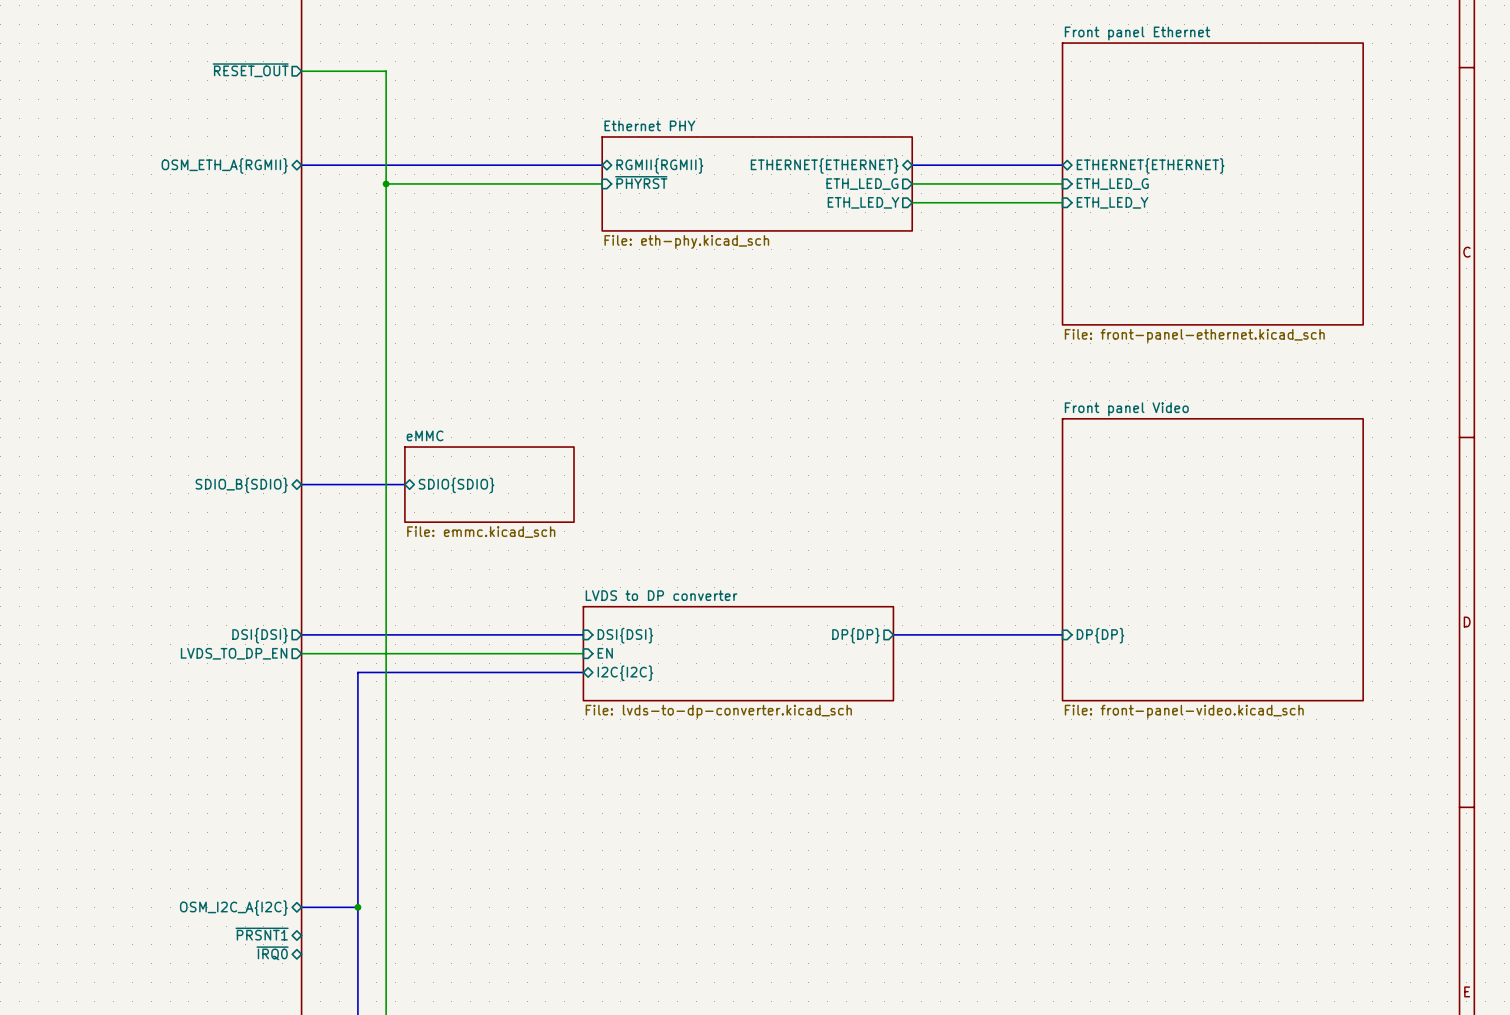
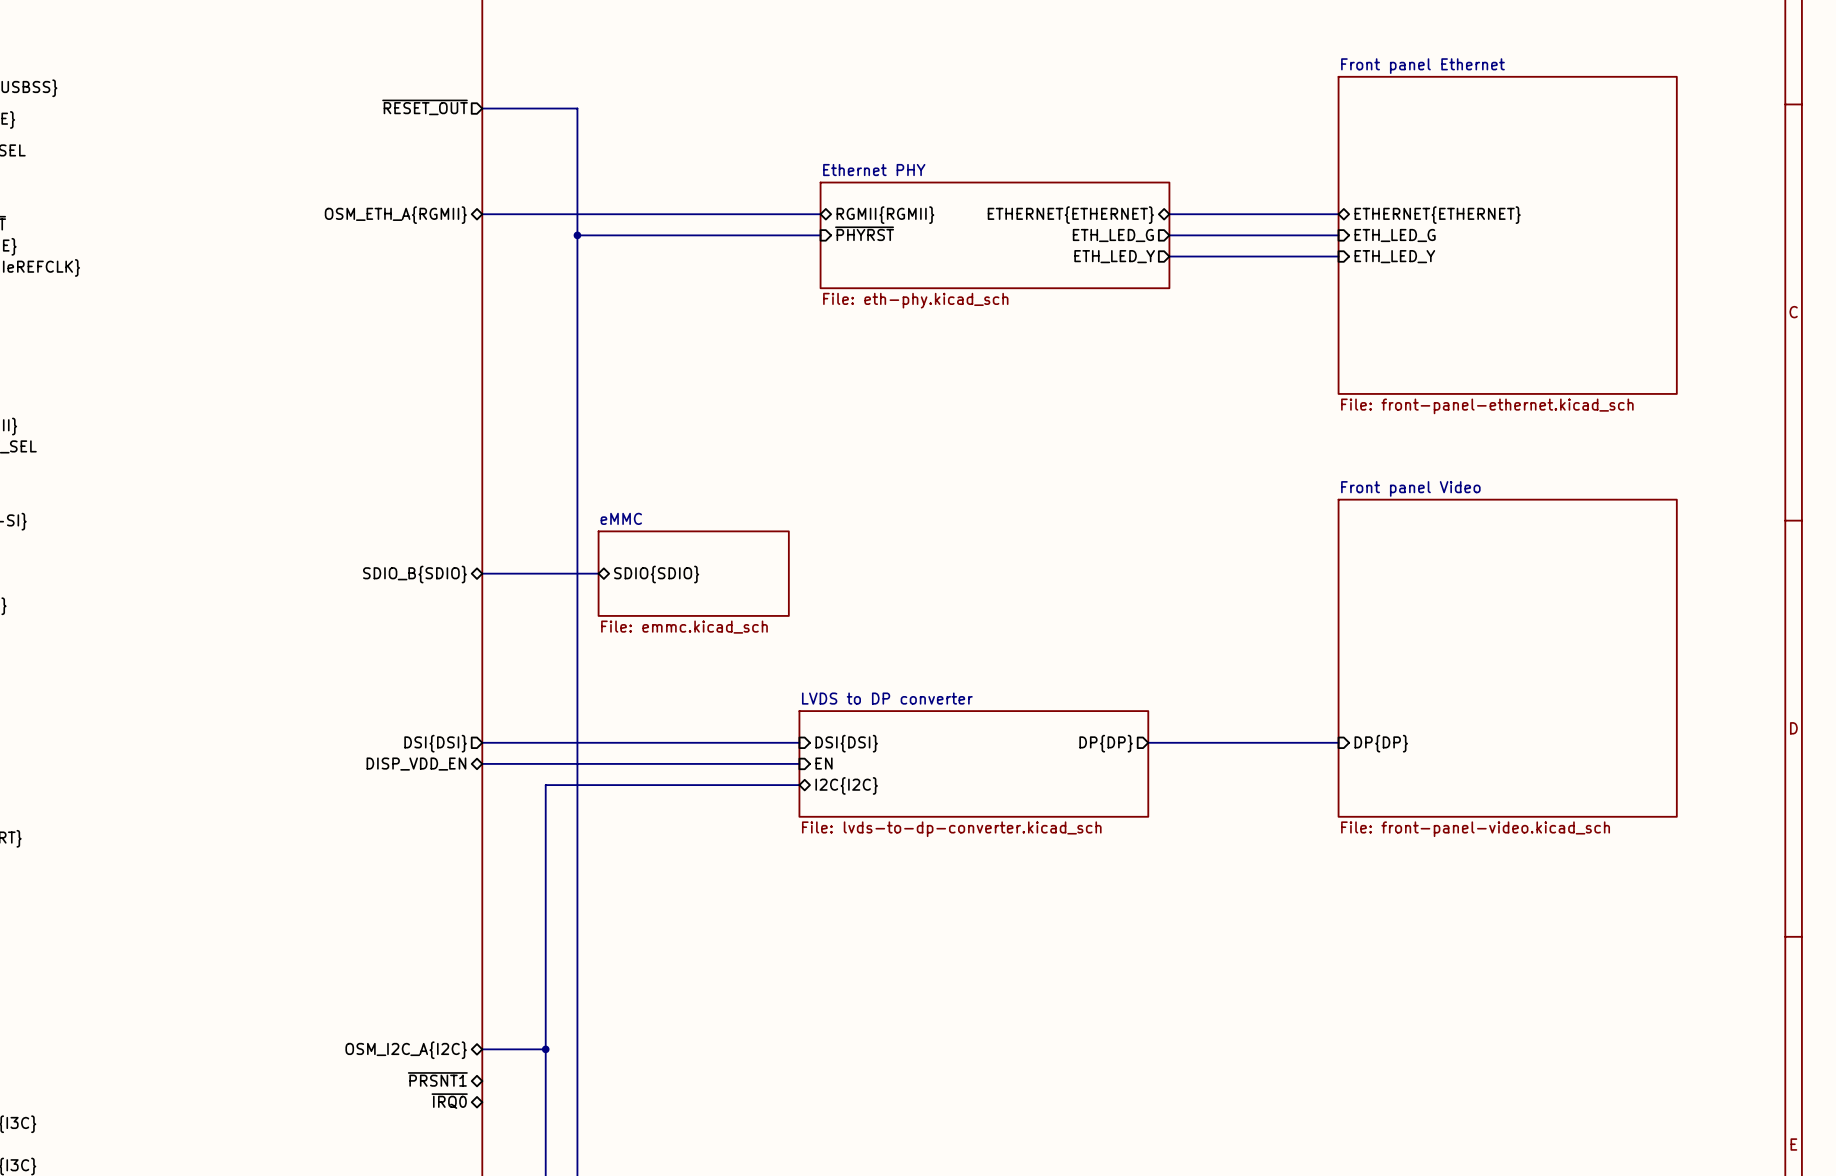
sheet pin shape: output (234, 653) -> bidirectional (416, 764)
sheet pin: LVDS_TO_DP_EN (234, 653) -> DISP_VDD_EN (416, 764)

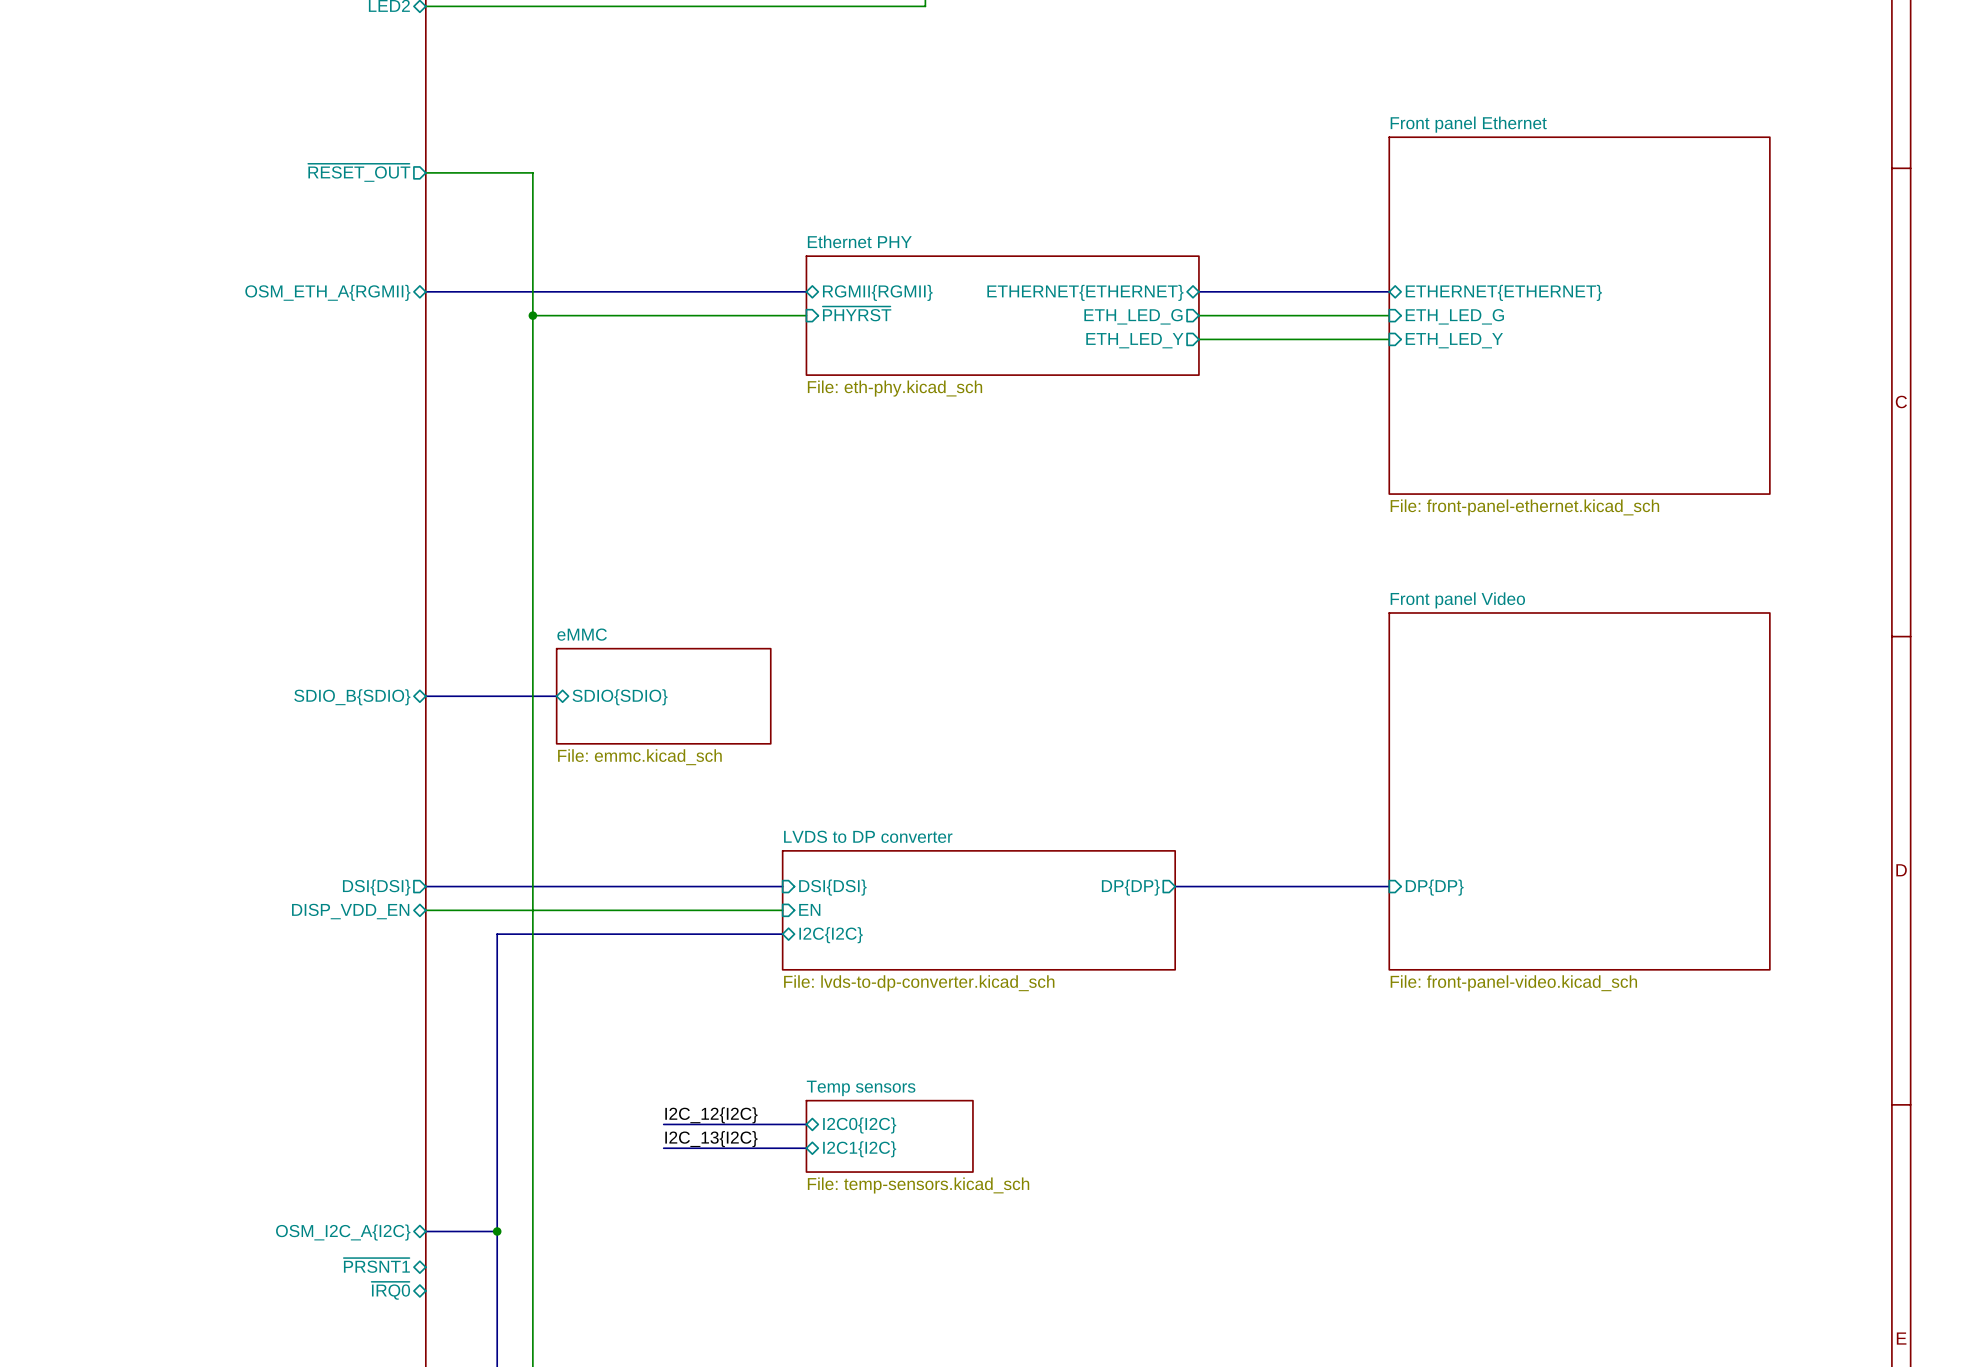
label: none -> I2C_12{I2C} (711, 1115)
bus: none -> (663, 1124) (806, 1124)
sheet pin: none -> I2C0{I2C} (859, 1125)
sheet Temp sensors: none -> File: temp-sensors.kicad_sch (889, 1136)
label: none -> I2C_13{I2C} (711, 1139)
bus: none -> (663, 1148) (806, 1148)
sheet pin: none -> I2C1{I2C} (859, 1149)

